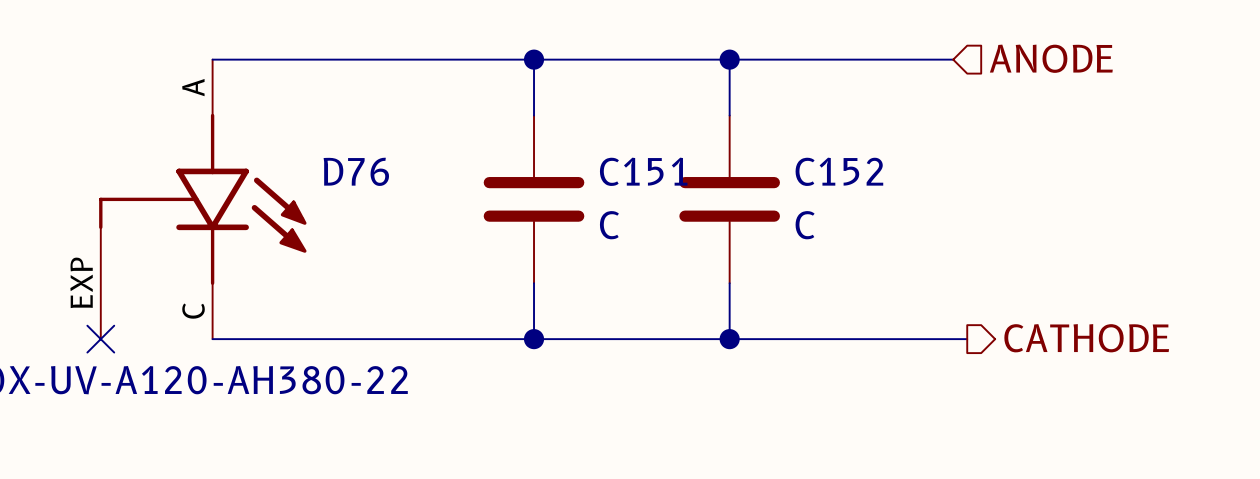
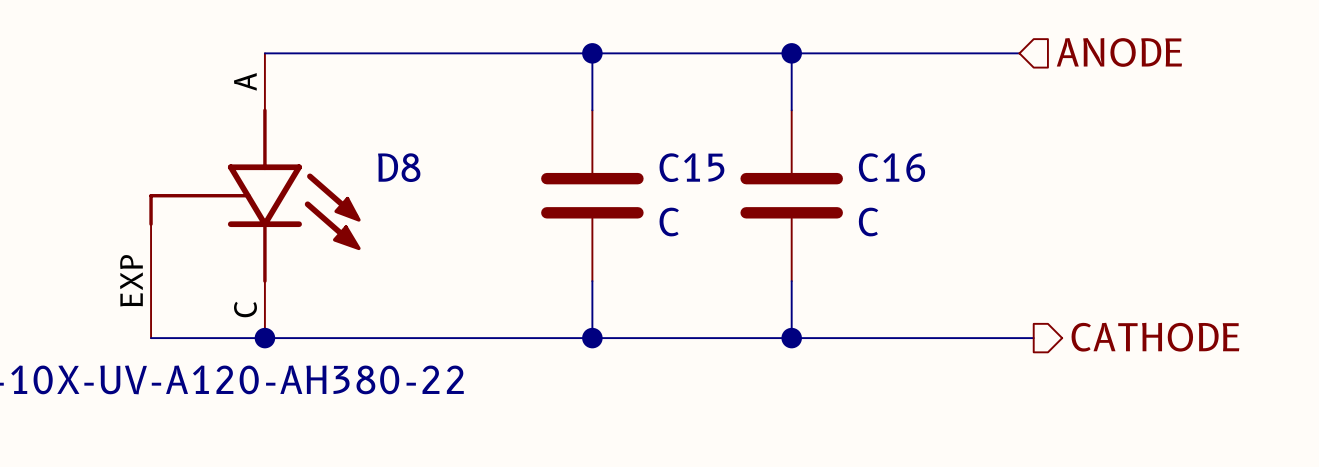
D76 name: D76 (356, 171) -> D8 (399, 167)
C151 name: C151 (643, 171) -> C15 (691, 167)
C152 name: C152 (839, 171) -> C16 (891, 167)
wire: none -> (151, 338) (264, 338)
no-connect mark: (100, 339) -> none
junction: none -> (264, 338)

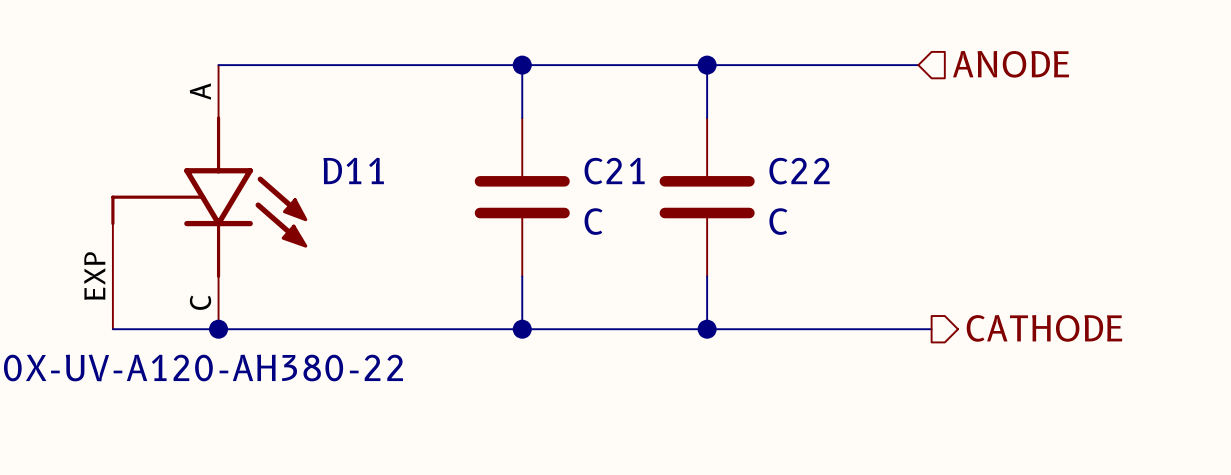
D8 name: D8 (399, 167) -> D11 (353, 170)
C15 name: C15 (691, 167) -> C21 (614, 171)
C16 name: C16 (891, 167) -> C22 (799, 171)

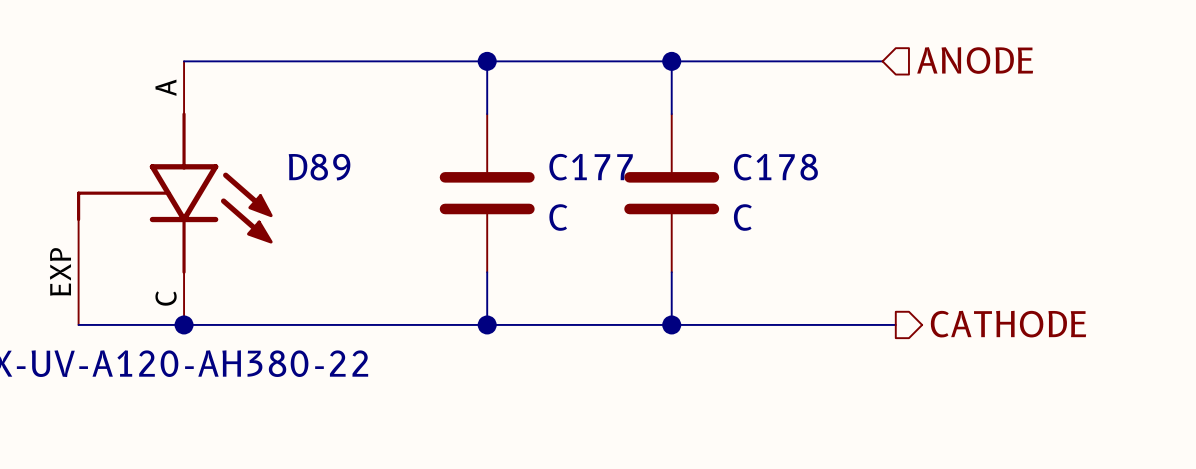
D11 name: D11 (353, 170) -> D89 (319, 167)
C21 name: C21 (614, 171) -> C177 (591, 167)
C22 name: C22 (799, 171) -> C178 (775, 167)

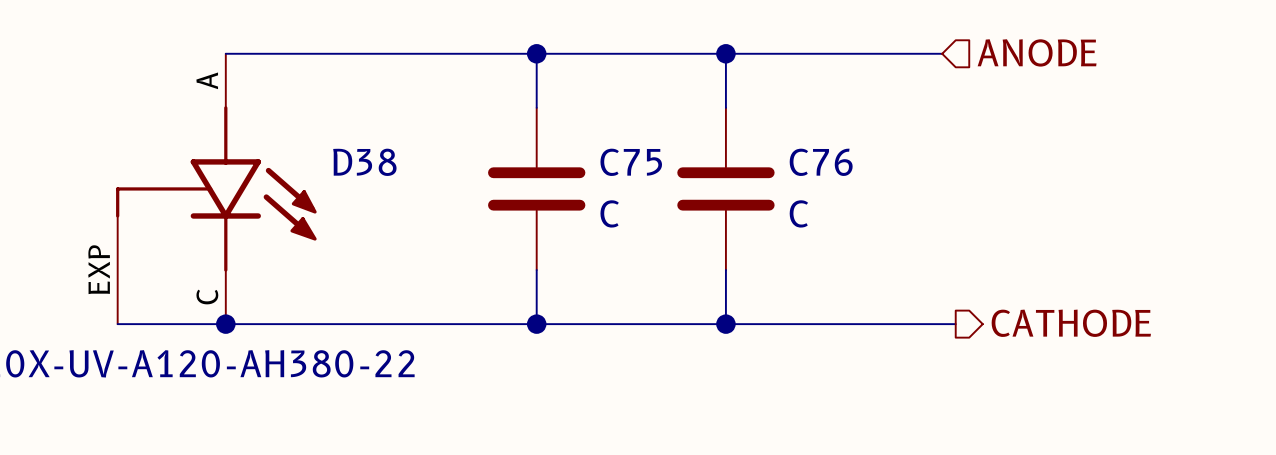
D89 name: D89 (319, 167) -> D38 (364, 162)
C177 name: C177 (591, 167) -> C75 (631, 162)
C178 name: C178 (775, 167) -> C76 (821, 162)

